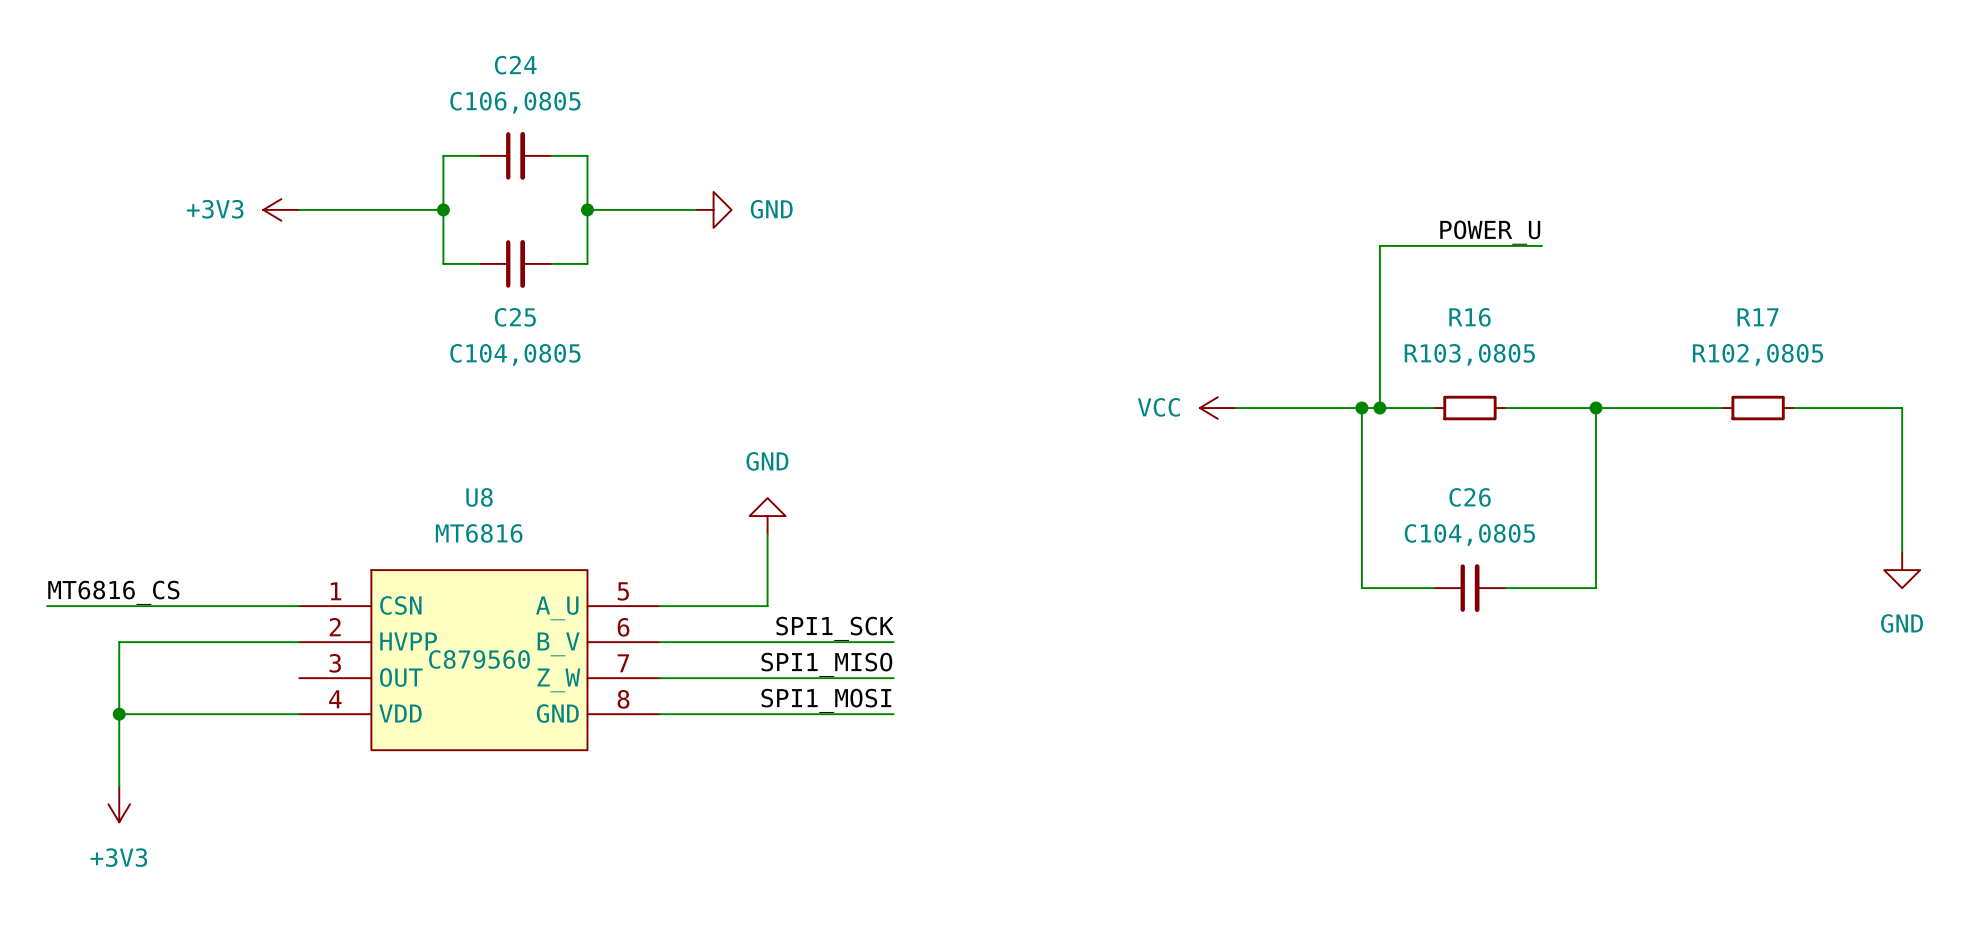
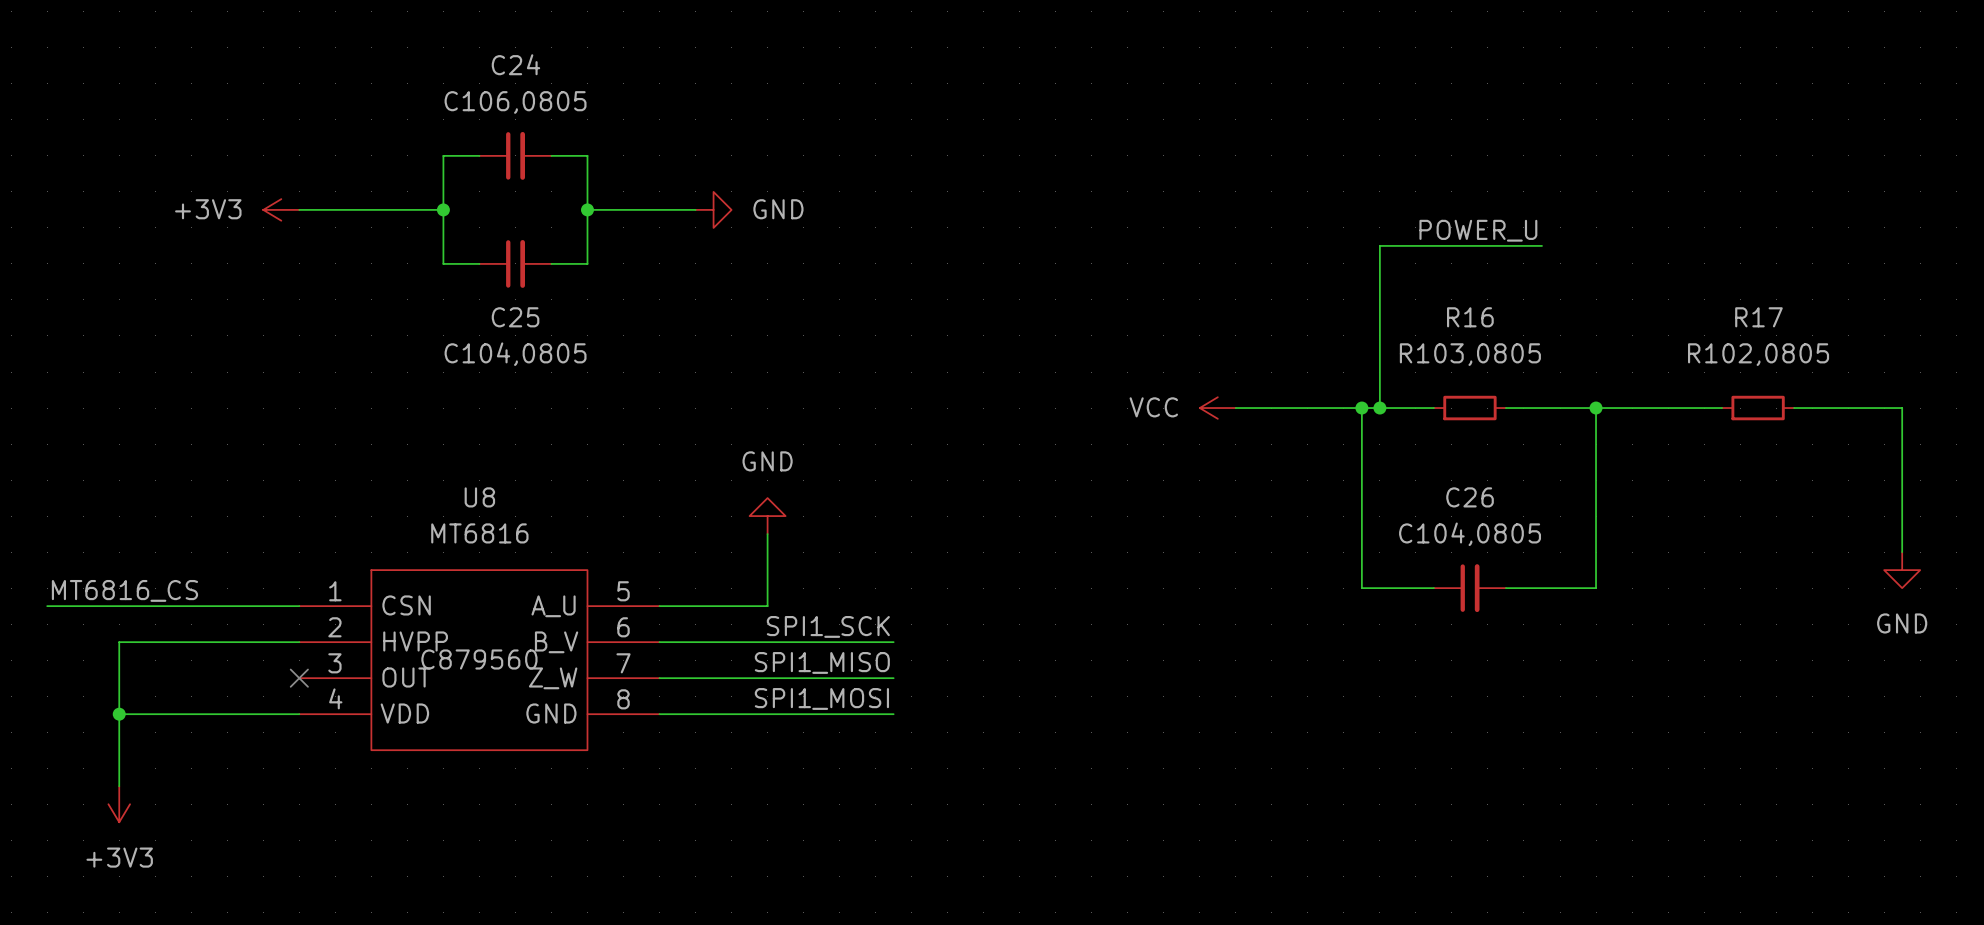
no-connect mark: none -> (299, 678)

